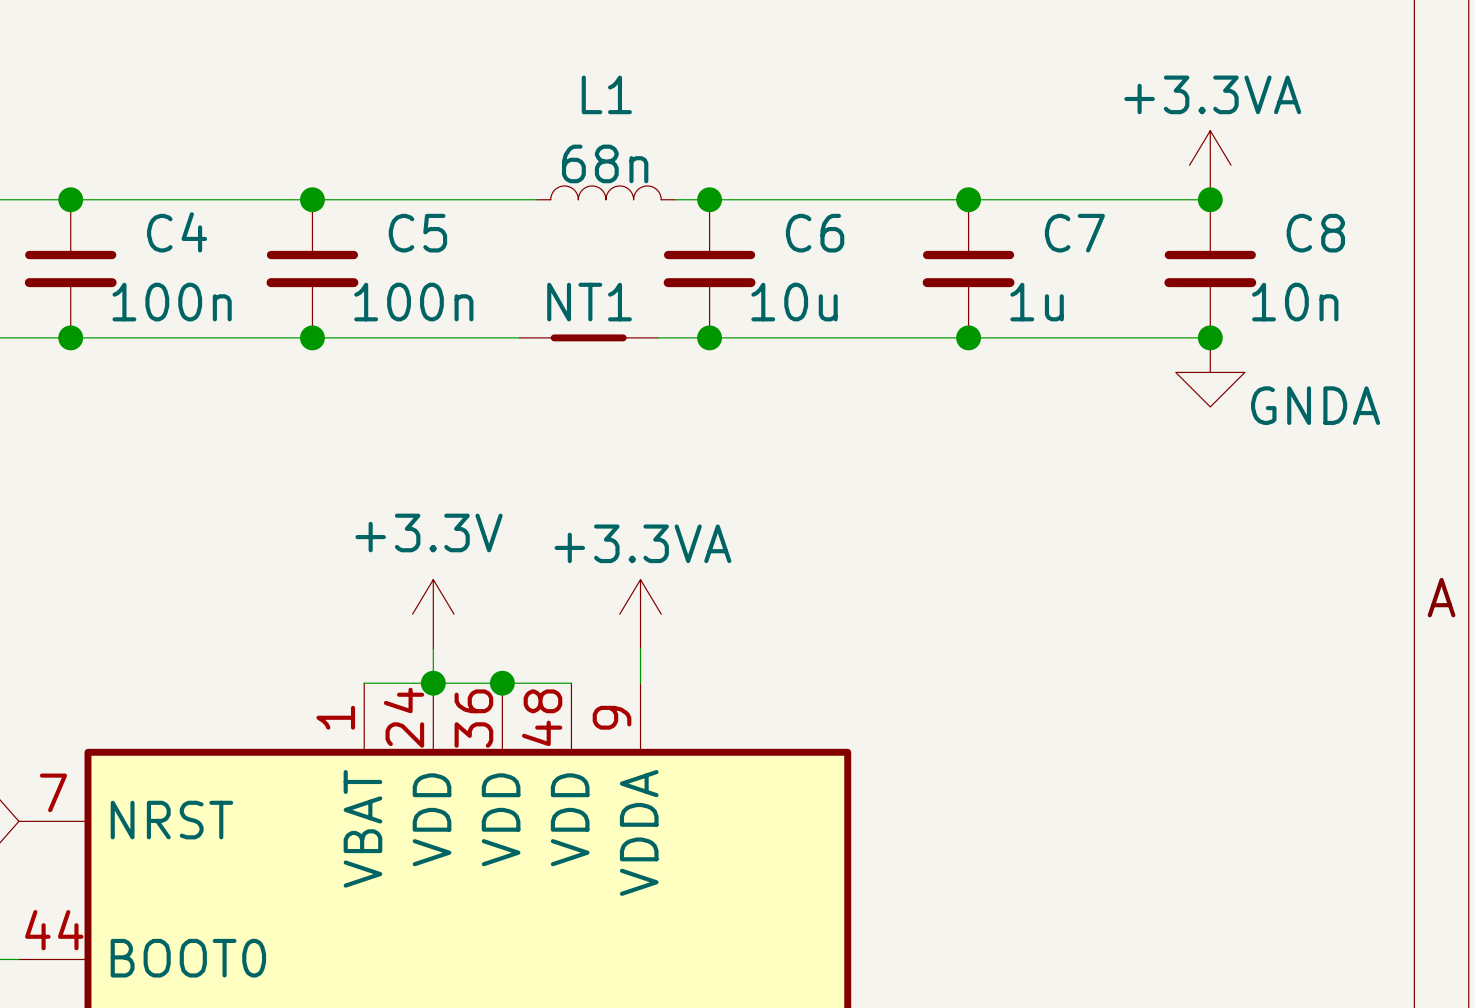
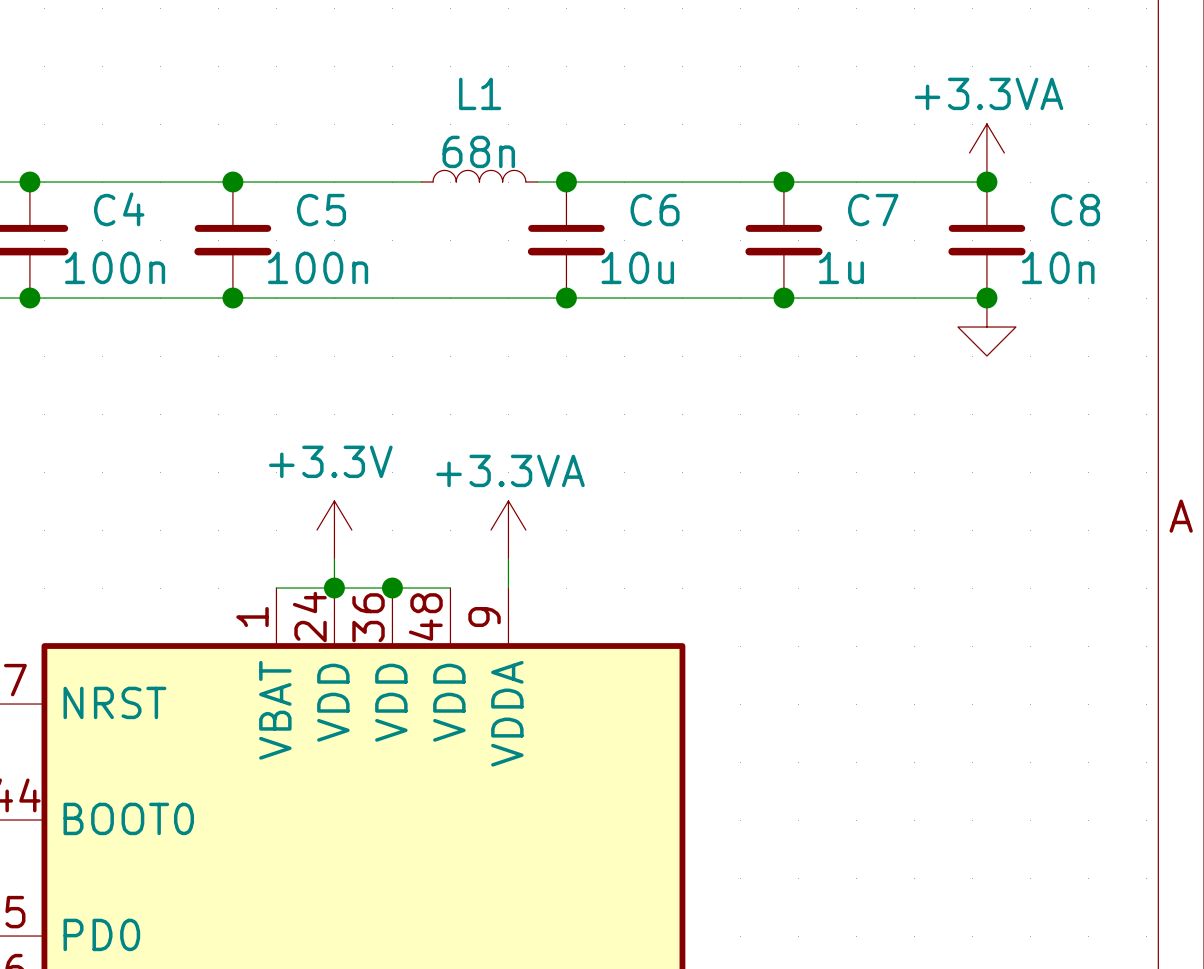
NT1: (588, 337) -> none
power symbol text: GNDA (1315, 405) -> none

